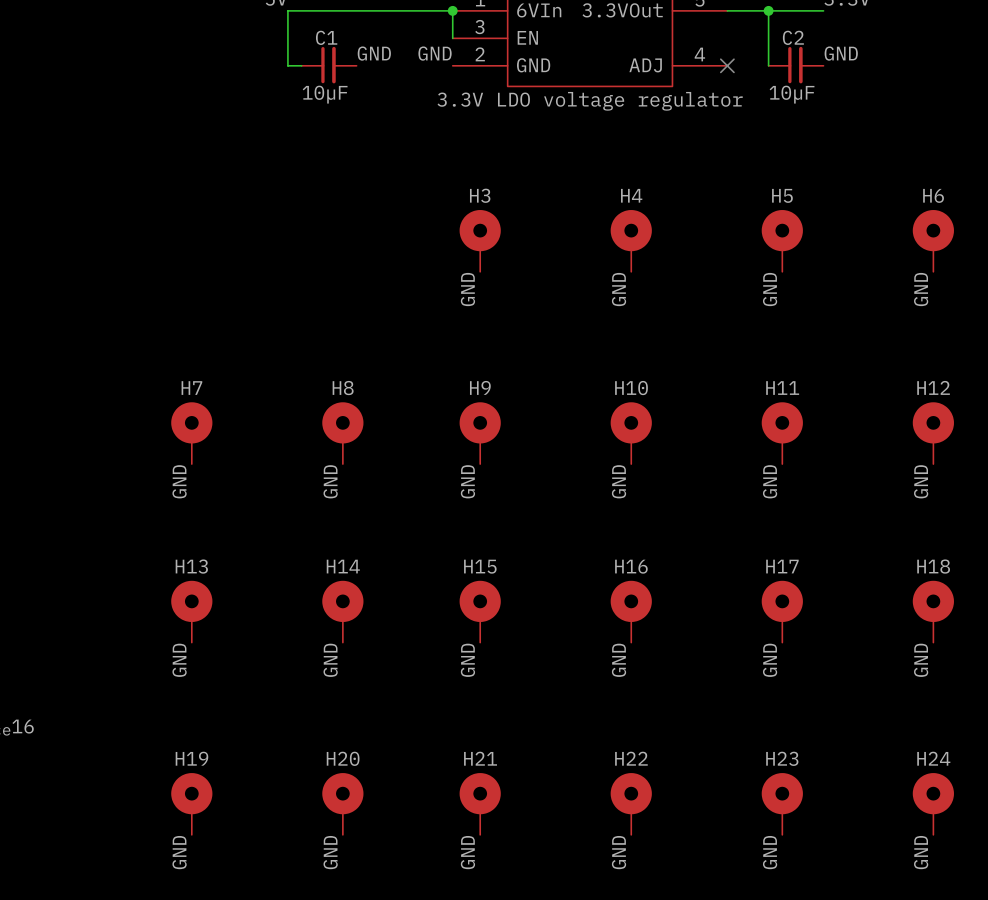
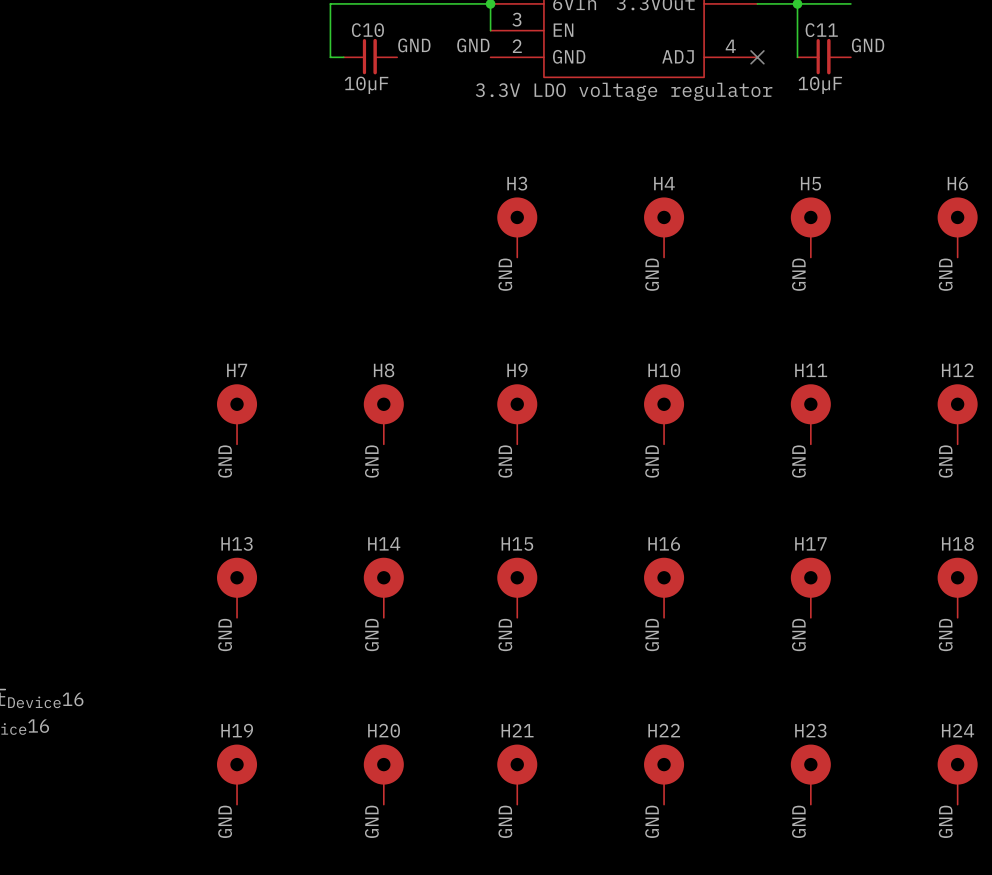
C1 name: C1 (326, 37) -> C10 (367, 30)
C2 name: C2 (793, 37) -> C11 (821, 30)

